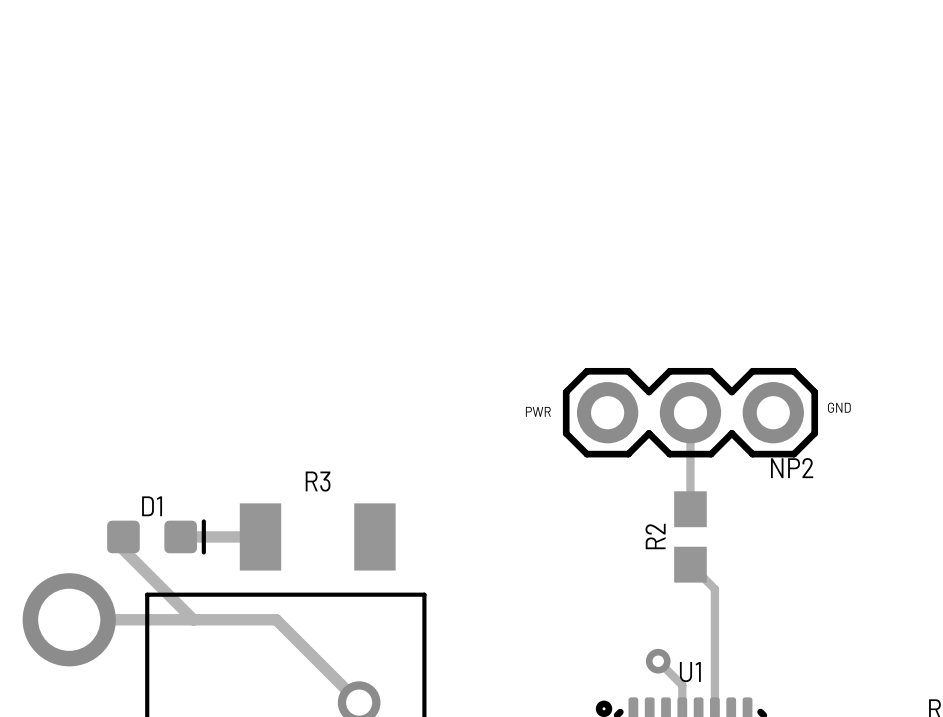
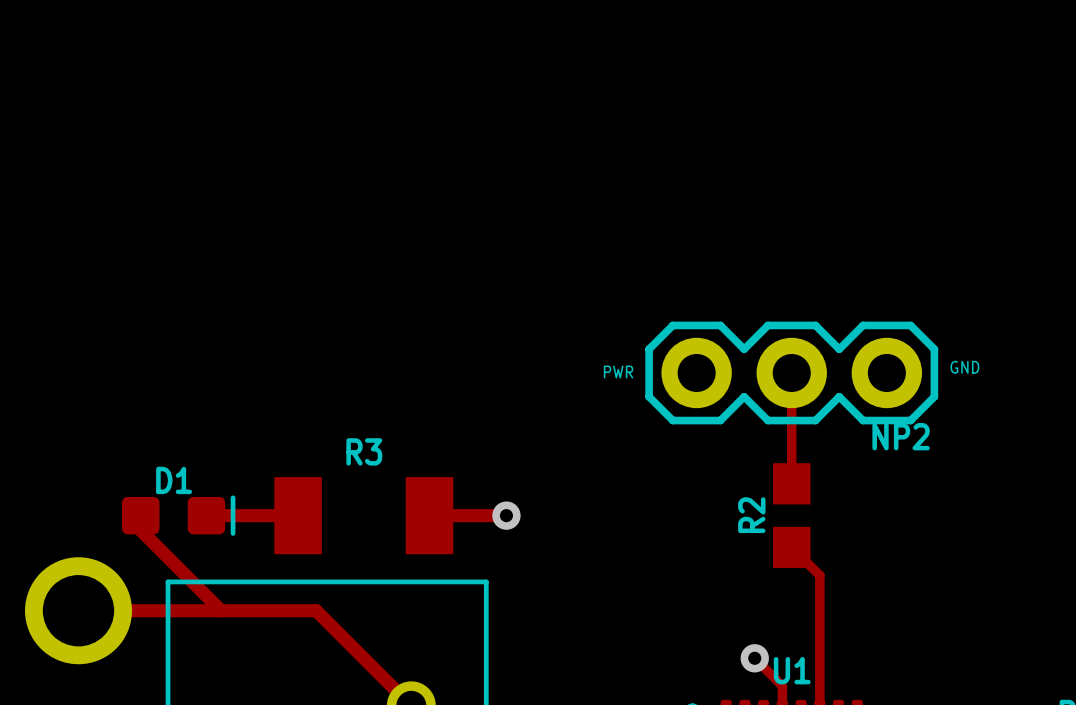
track: none -> (429, 515) (506, 515)
via: none -> (506, 515)

